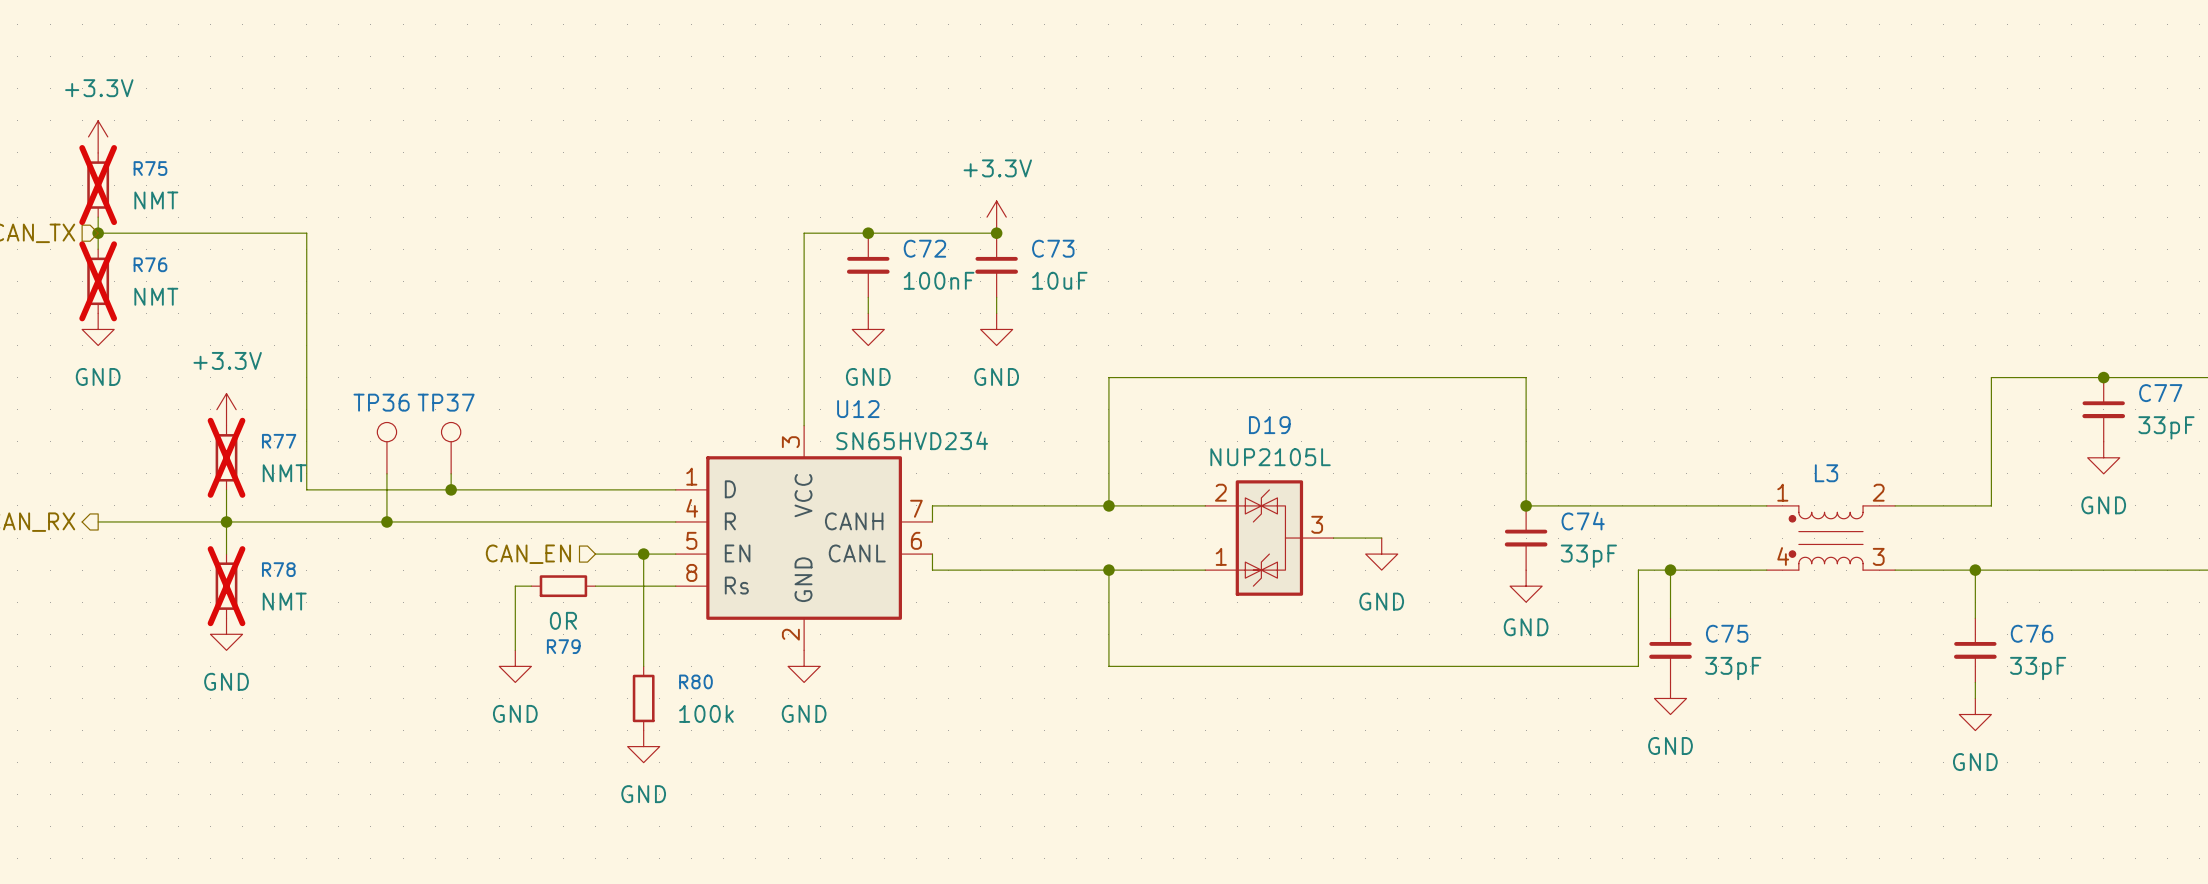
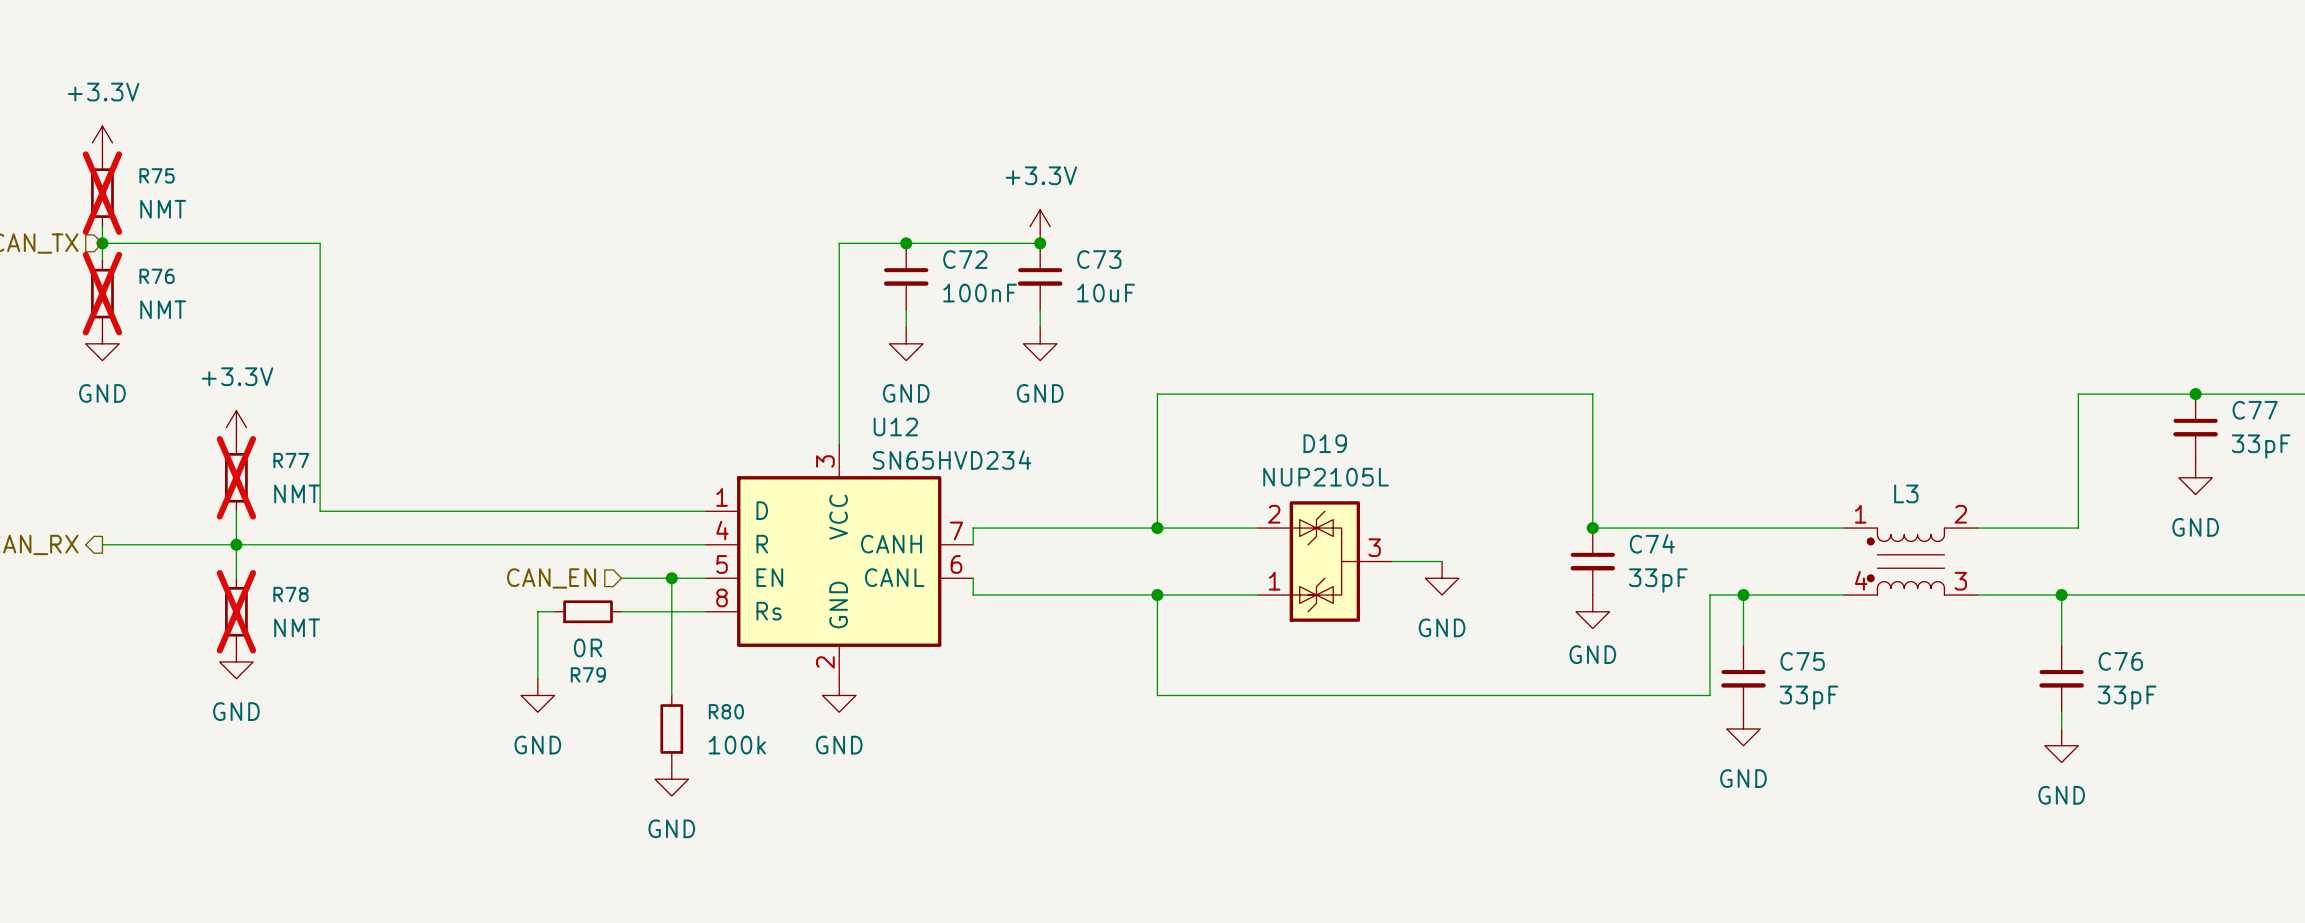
TP36: (386, 448) -> none
TP37: (451, 448) -> none
wire: (386, 473) (386, 521) -> none
wire: (451, 473) (451, 489) -> none
junction: (451, 489) -> none
junction: (386, 521) -> none

